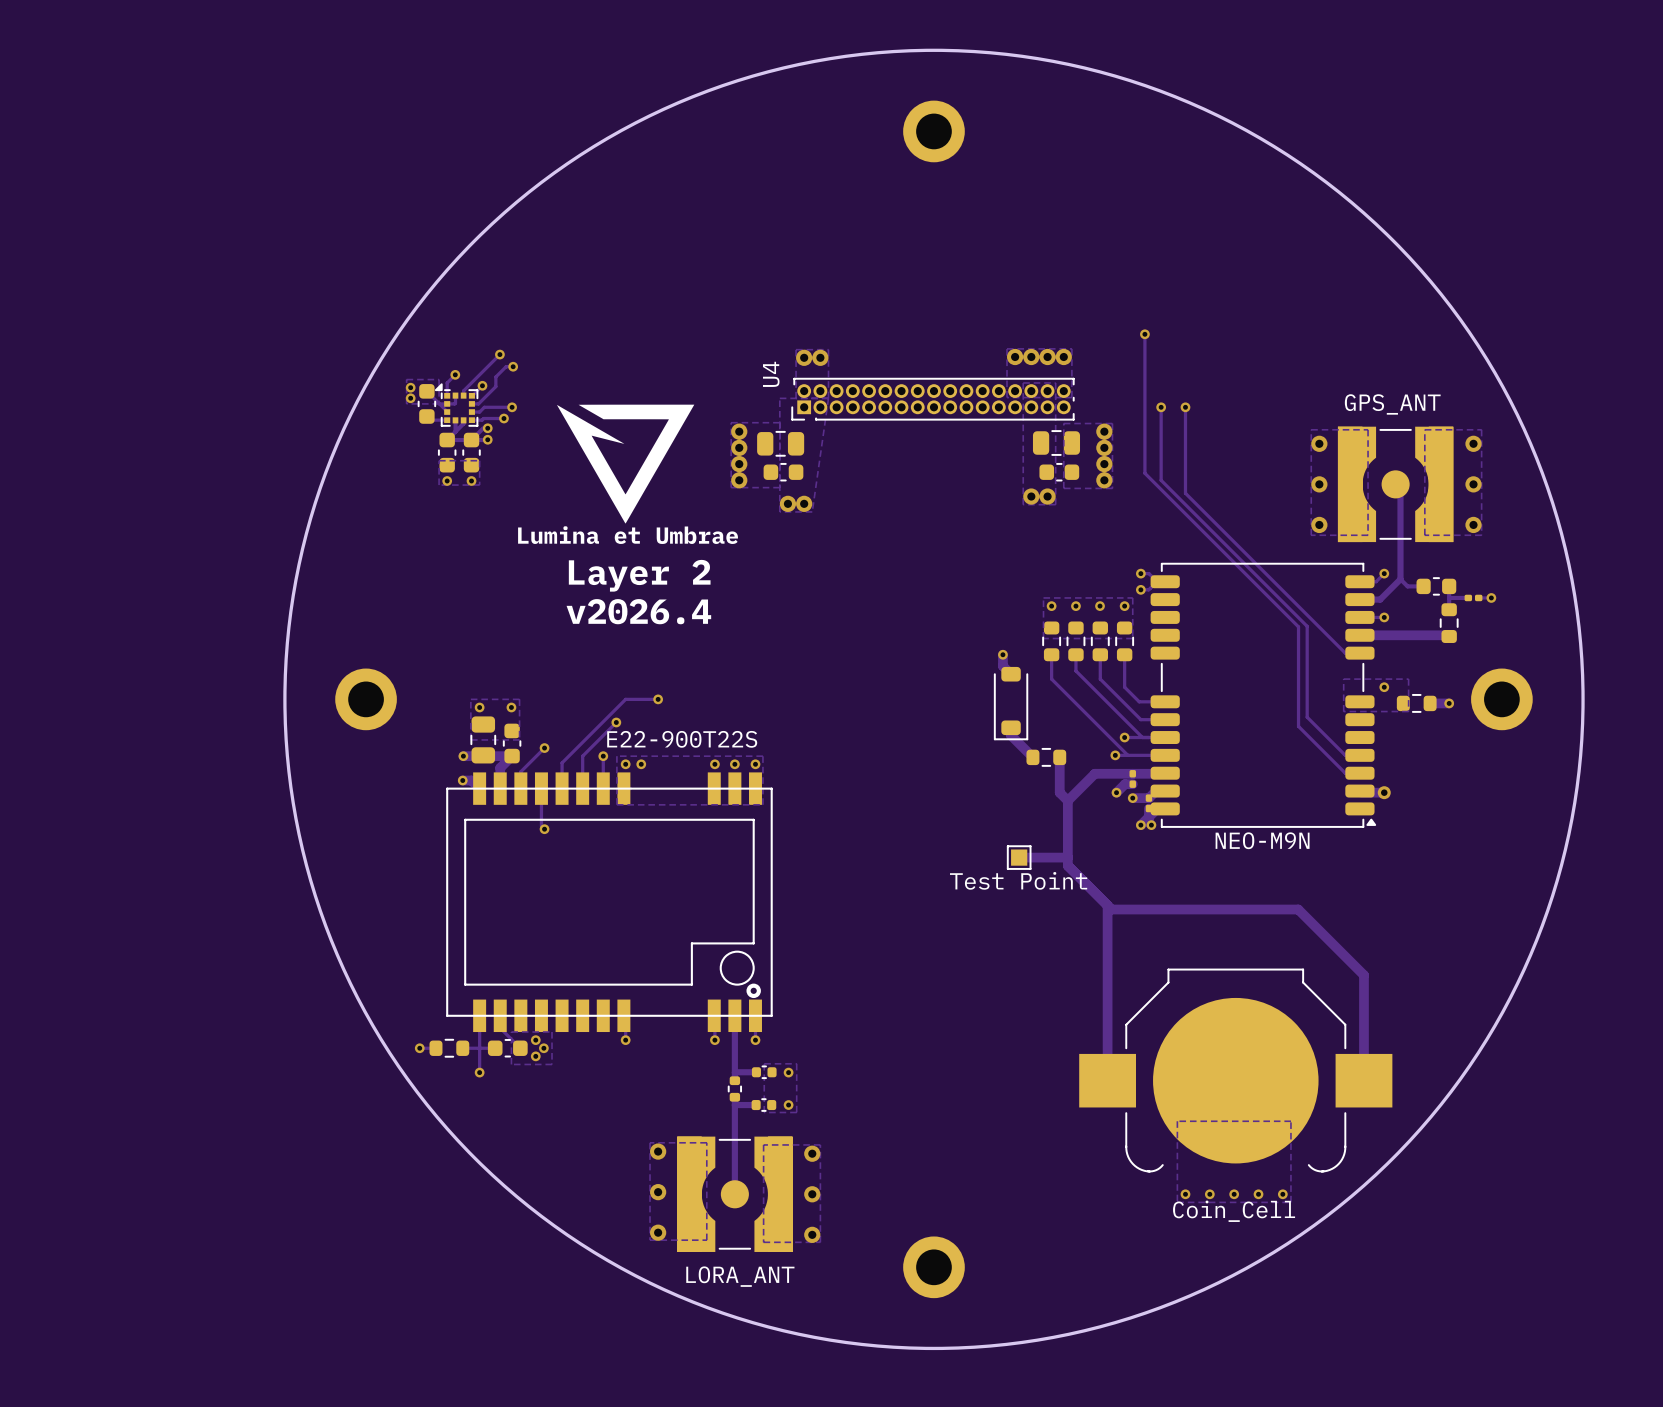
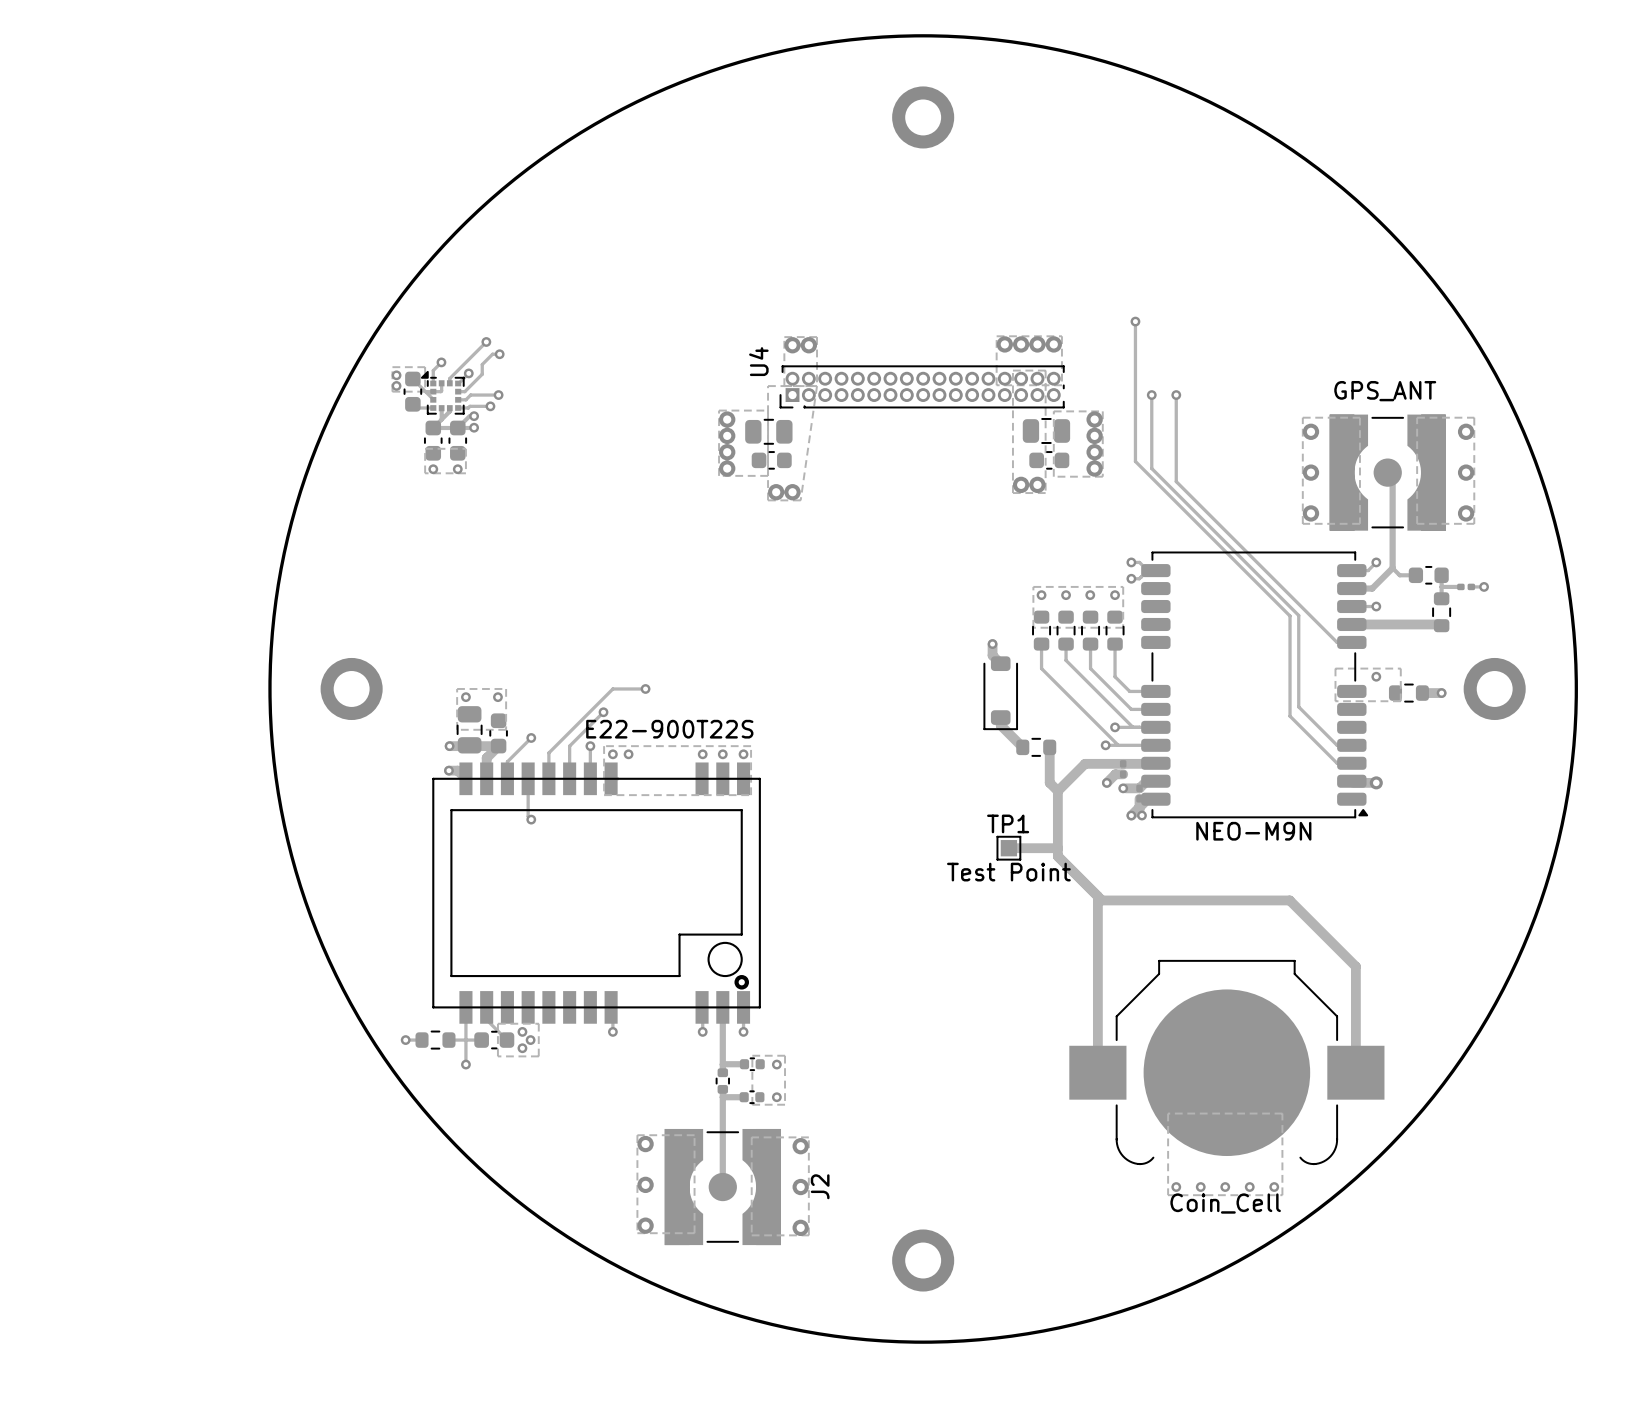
drawing: [557, 404, 695, 524] -> none
text: Layer 2 (639, 575) -> none
text: v2026.4 (638, 611) -> none
TP1 name: none -> TP1 (1008, 823)
LORA_ANT name: LORA_ANT (740, 1276) -> J2 (820, 1186)

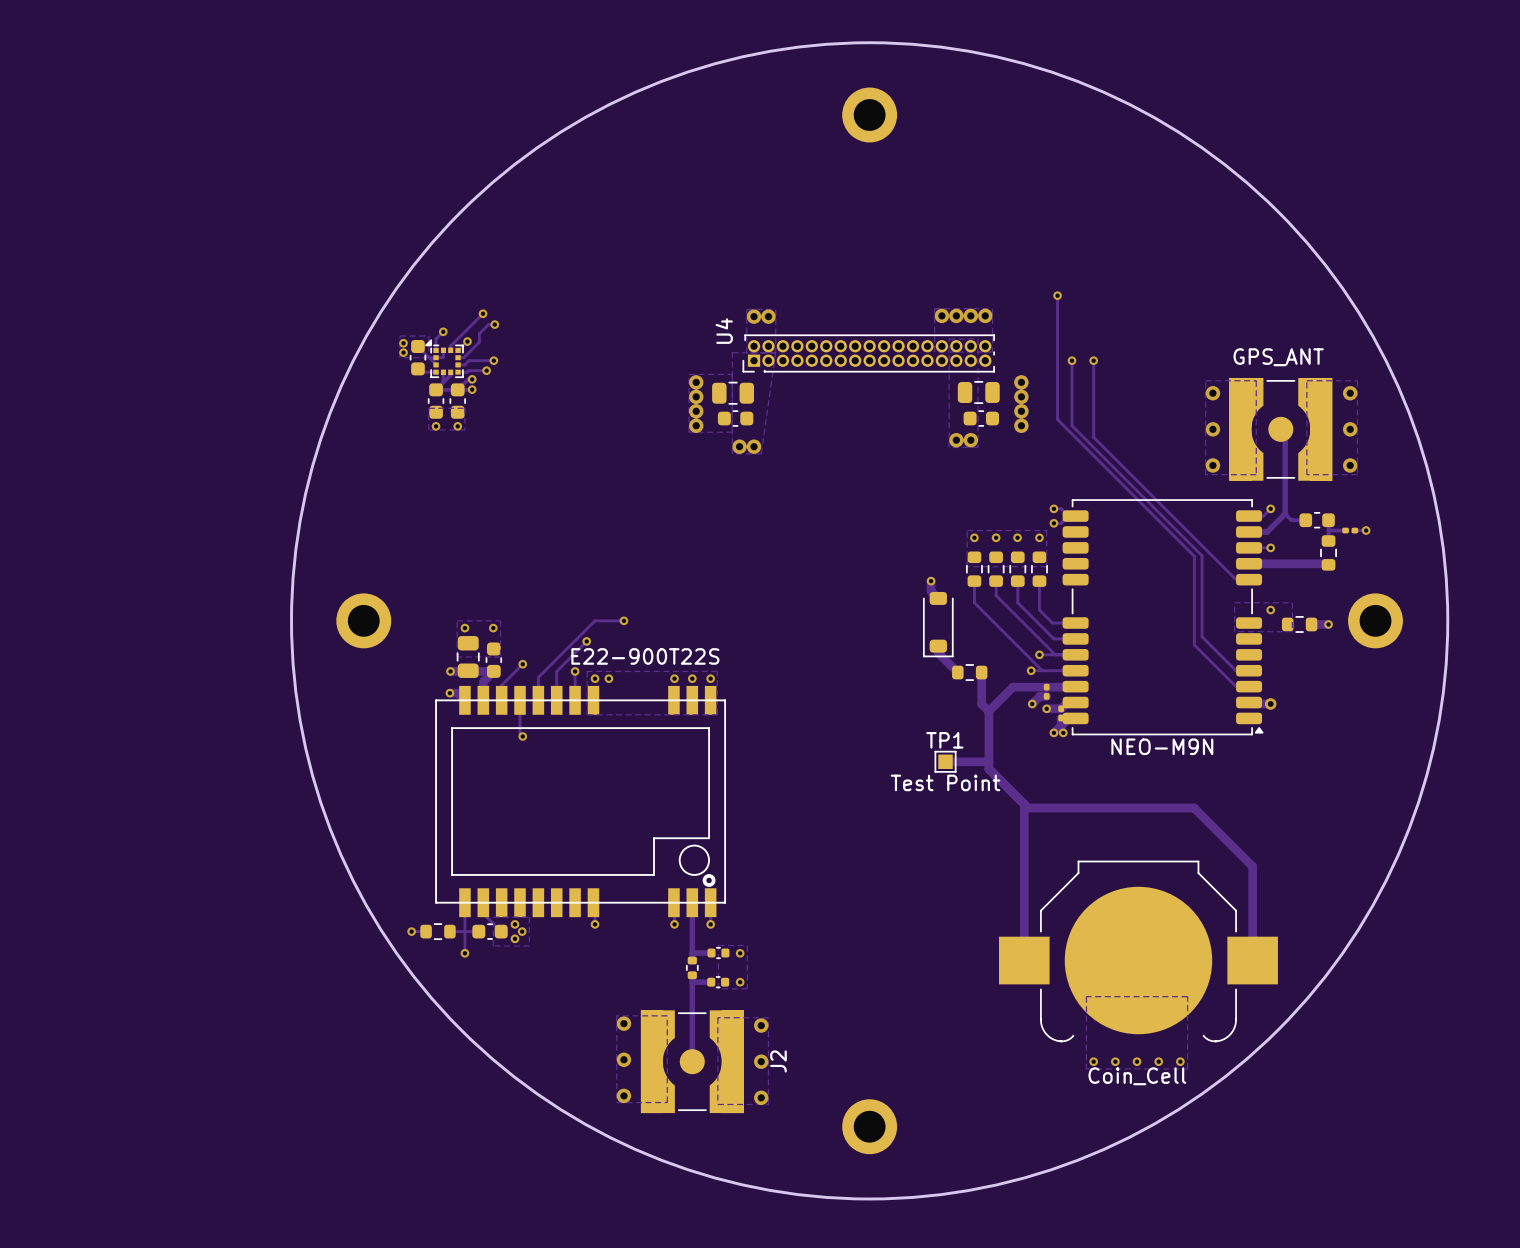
zone outline: (1053, 411) (1102, 411) (1102, 476) (1053, 476) (1053, 411) -> none

